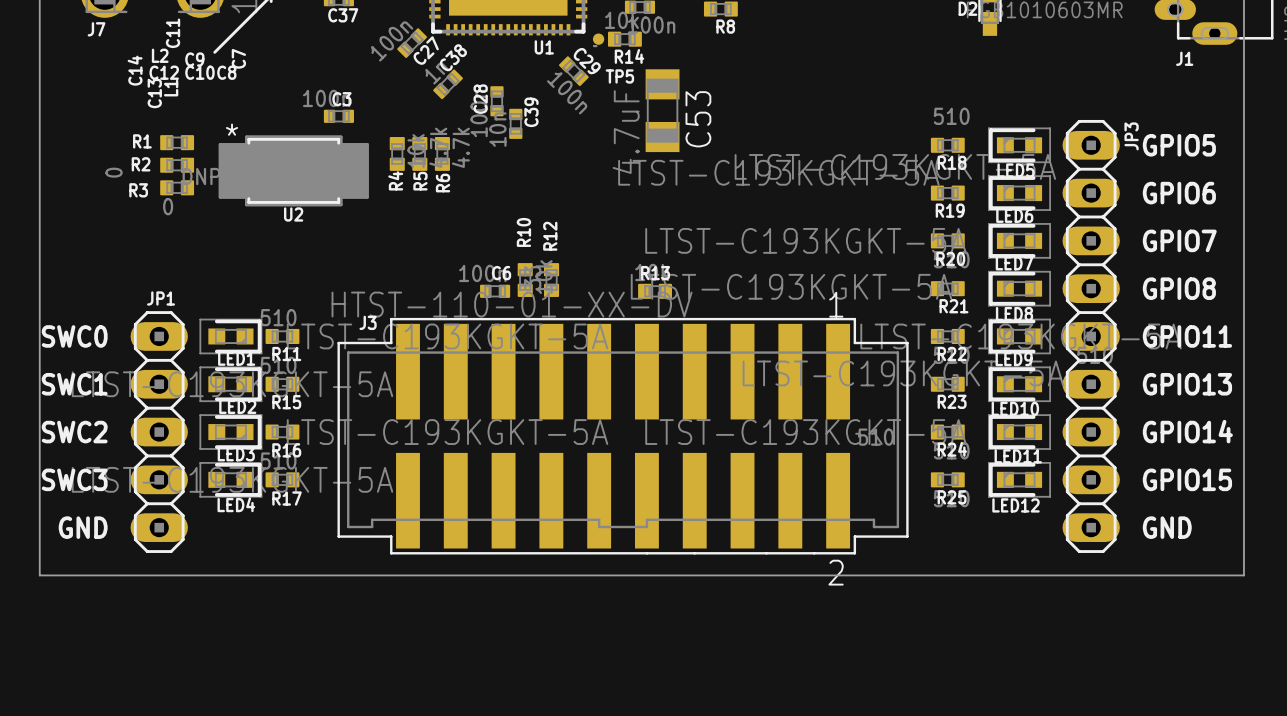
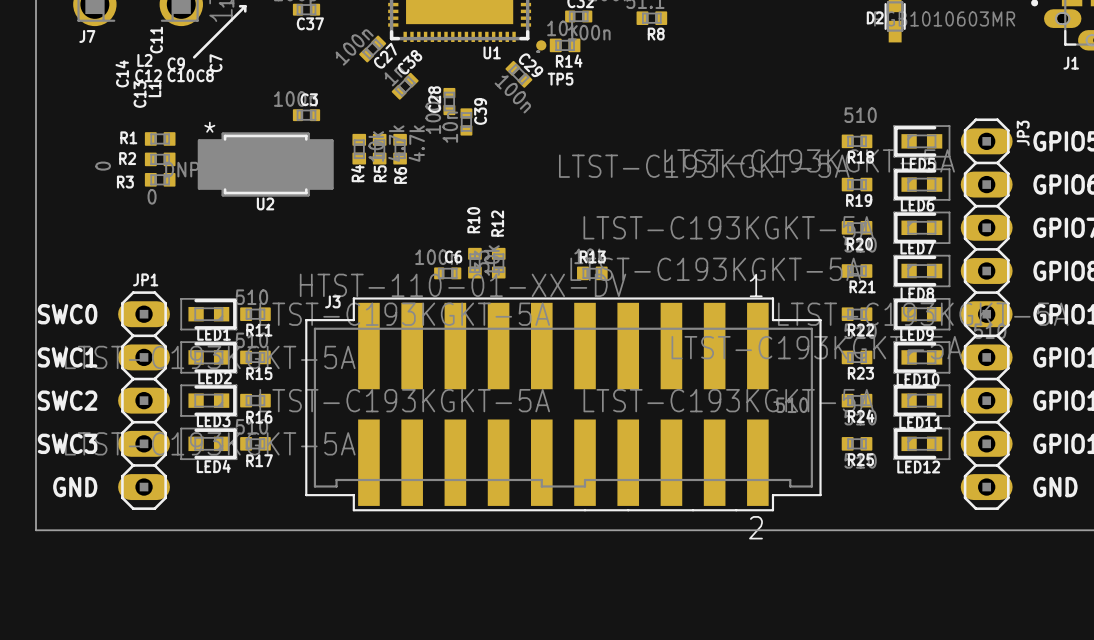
C53: 4.7uF (662, 110) -> none

